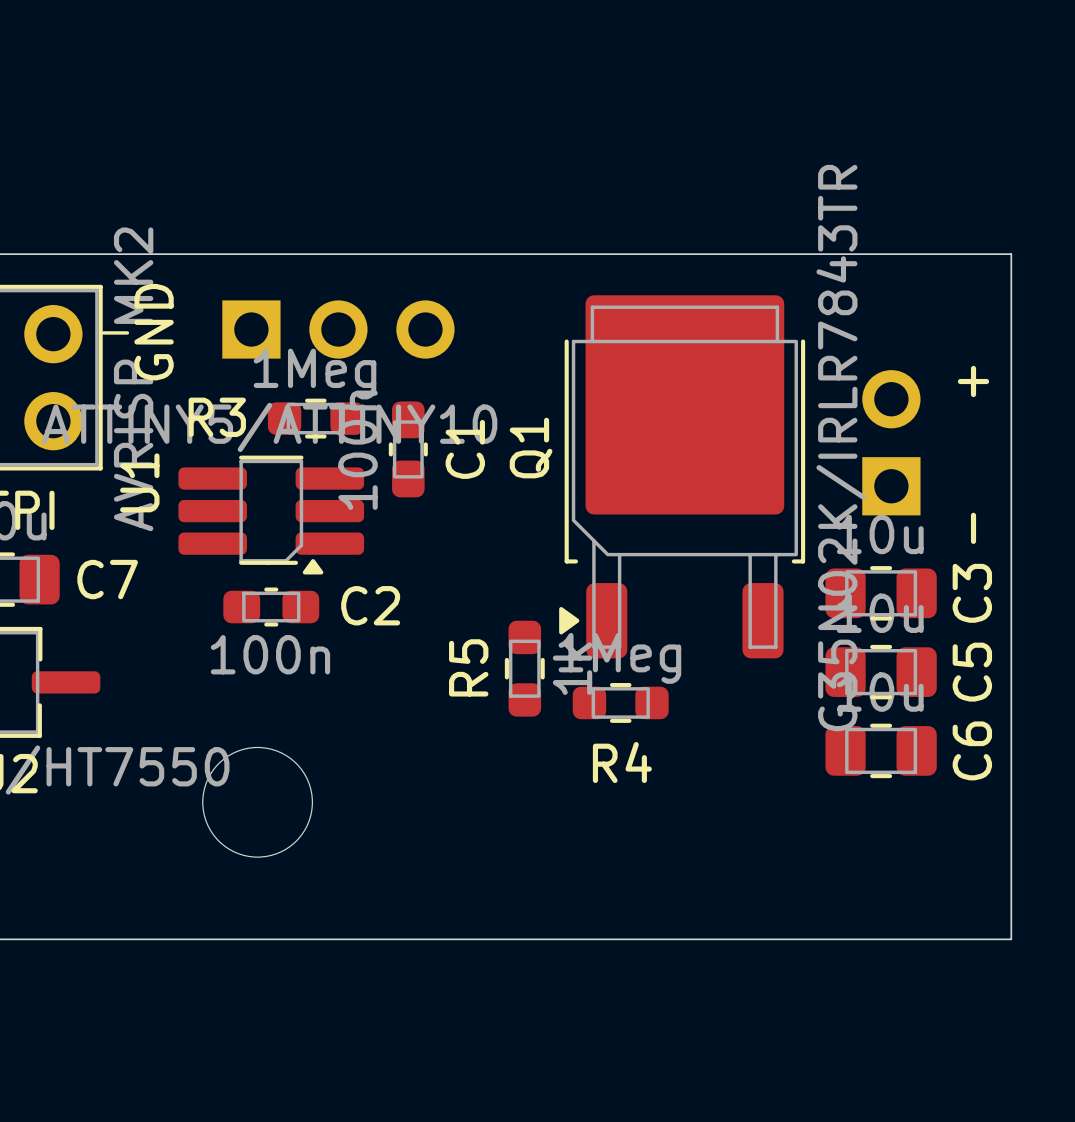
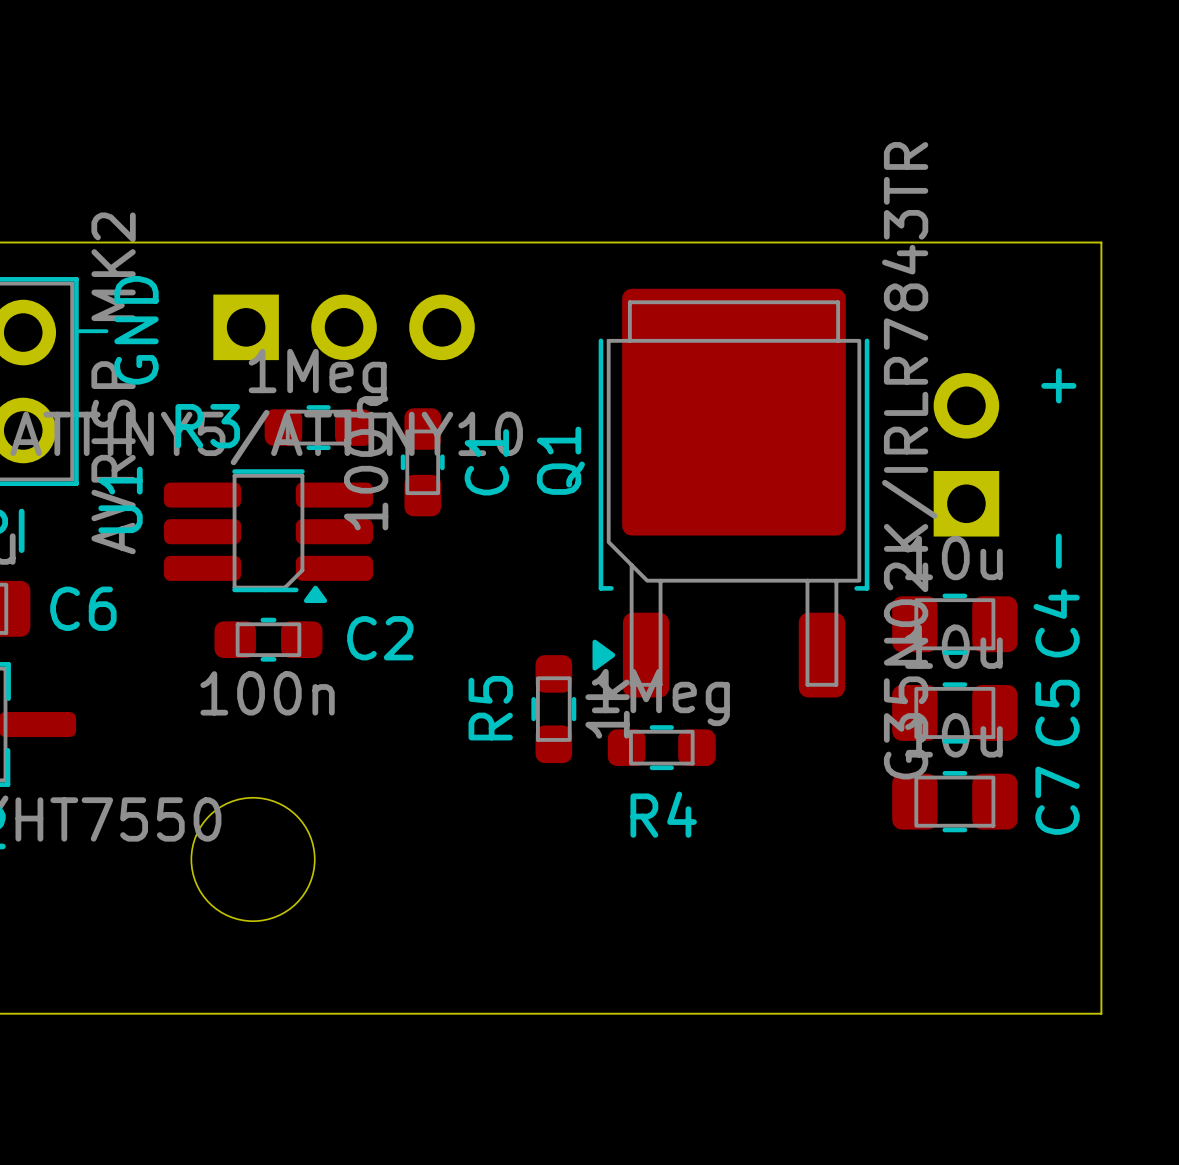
C7 name: C7 (107, 579) -> C6 (83, 608)
C3 name: C3 (972, 593) -> C4 (1056, 623)
C6 name: C6 (972, 750) -> C7 (1057, 800)

